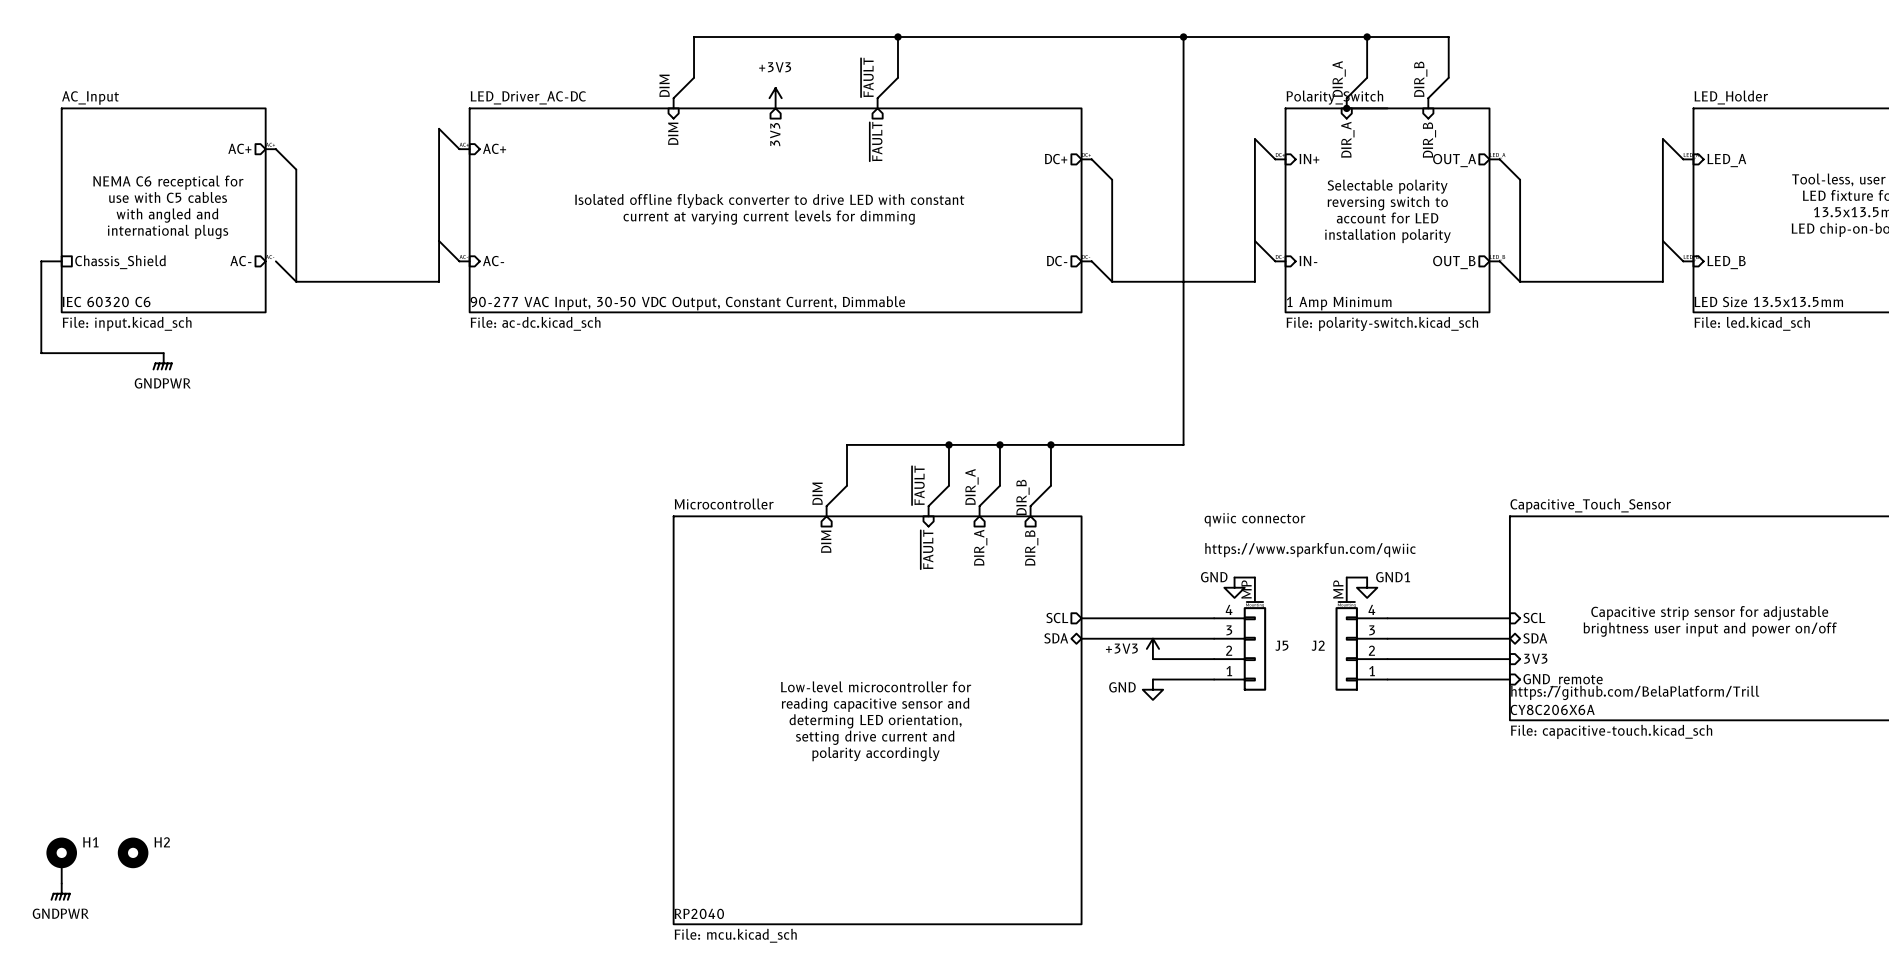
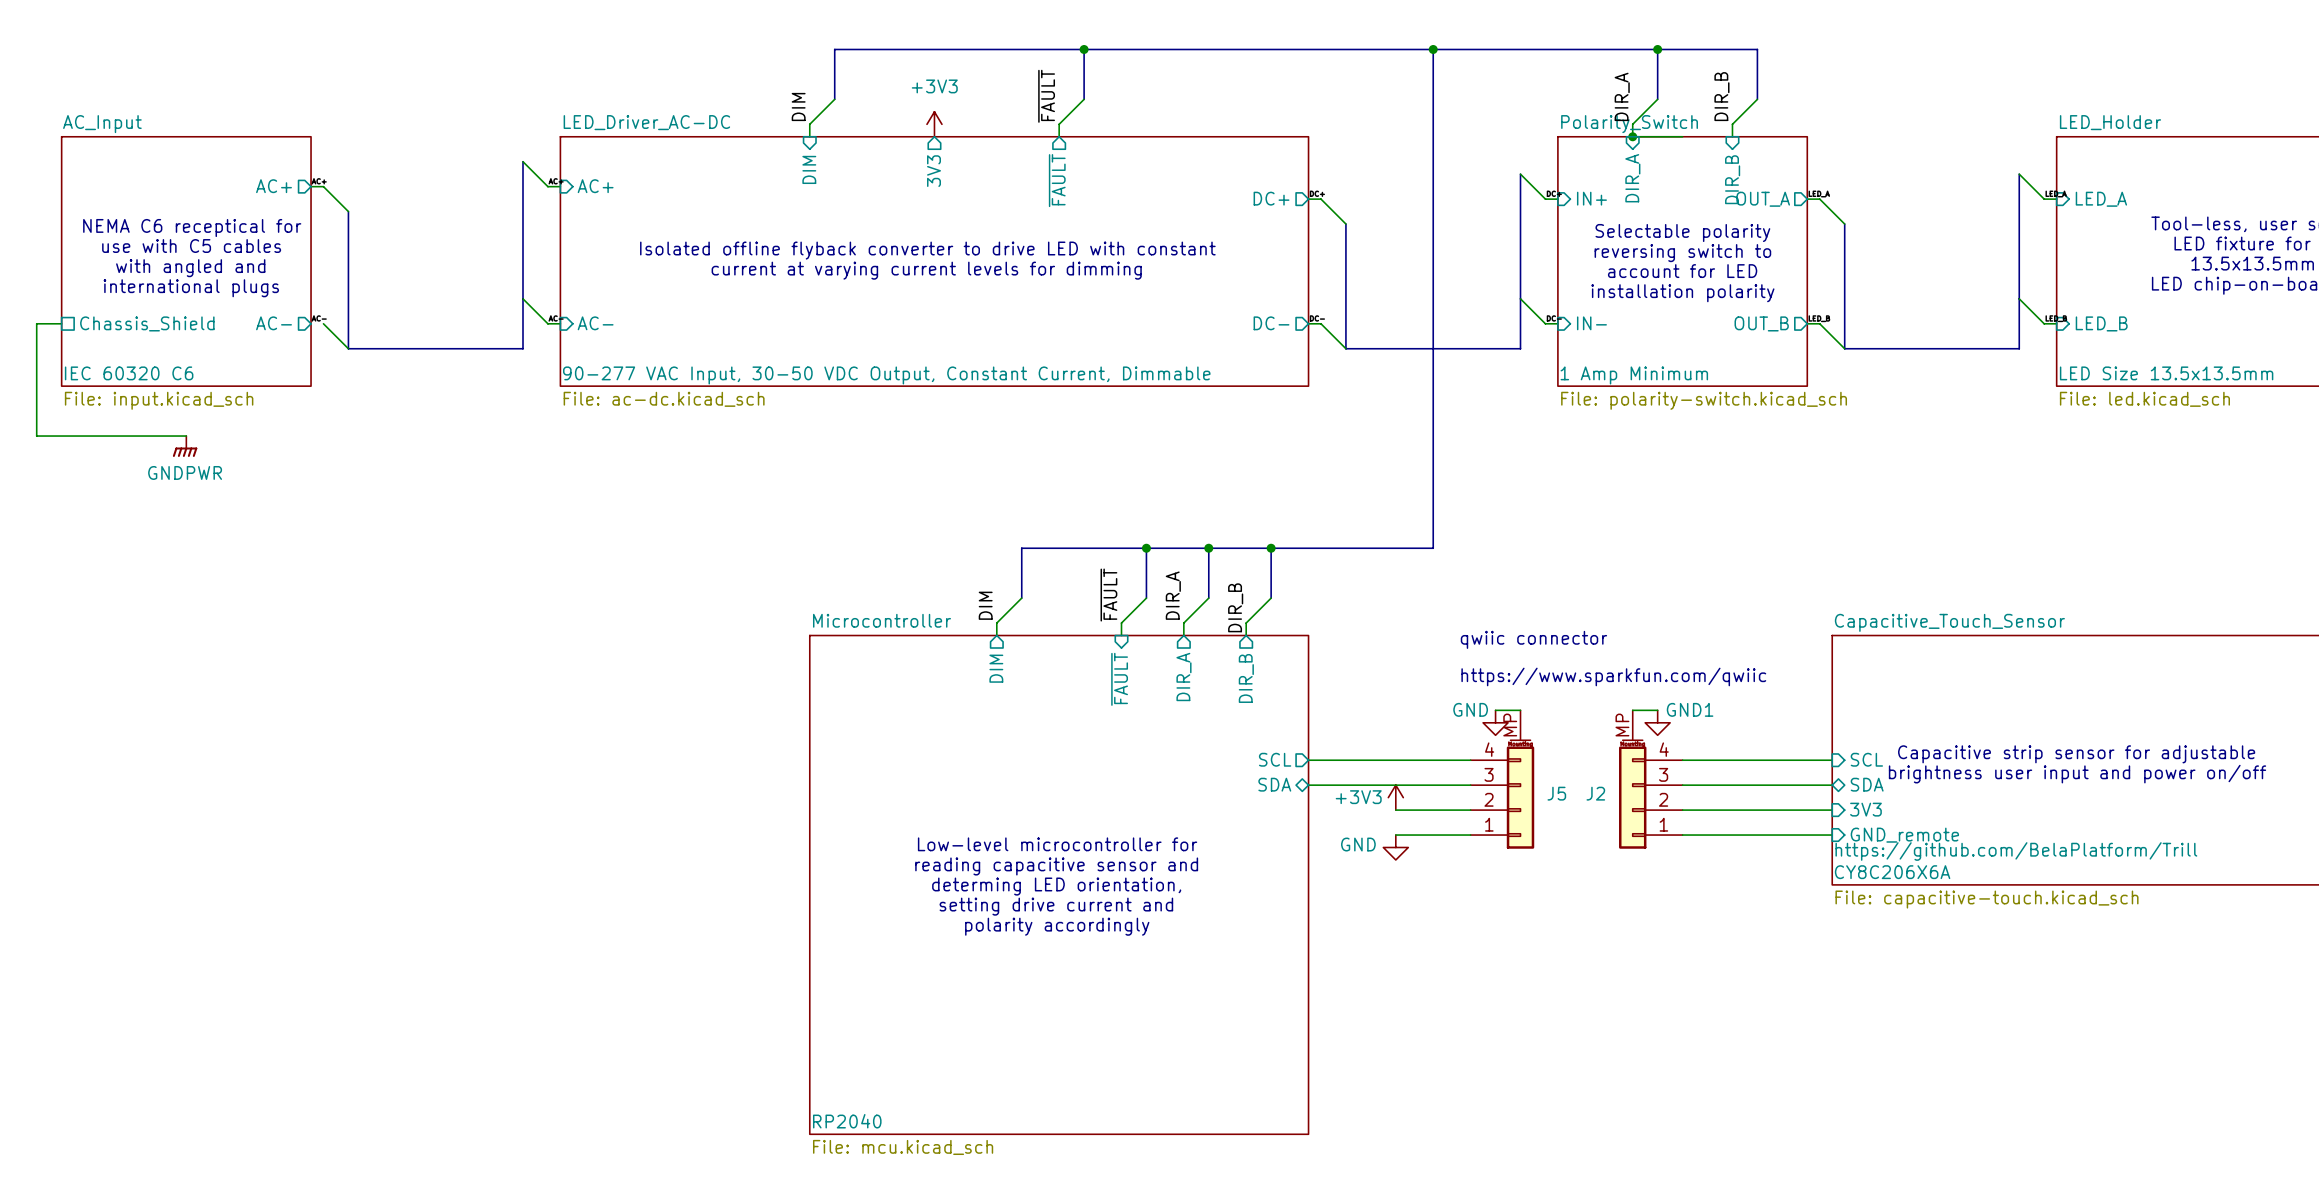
H2: (133, 852) -> none
H1: (61, 860) -> none
power symbol: GNDPWR (60, 892) -> none

